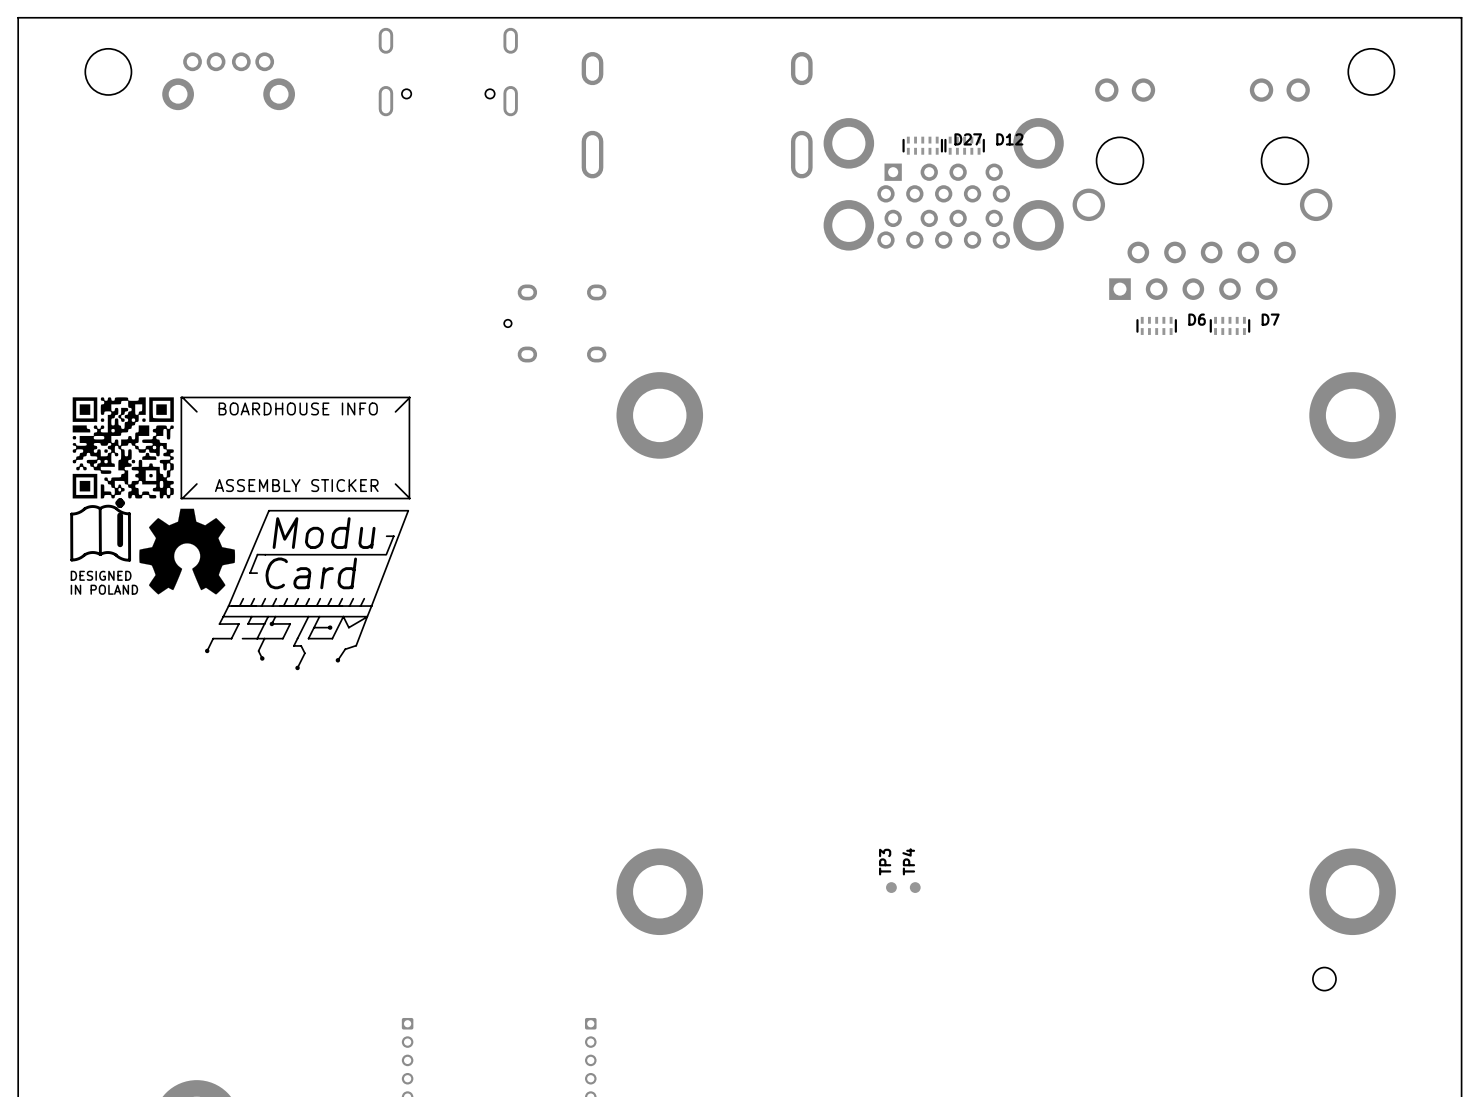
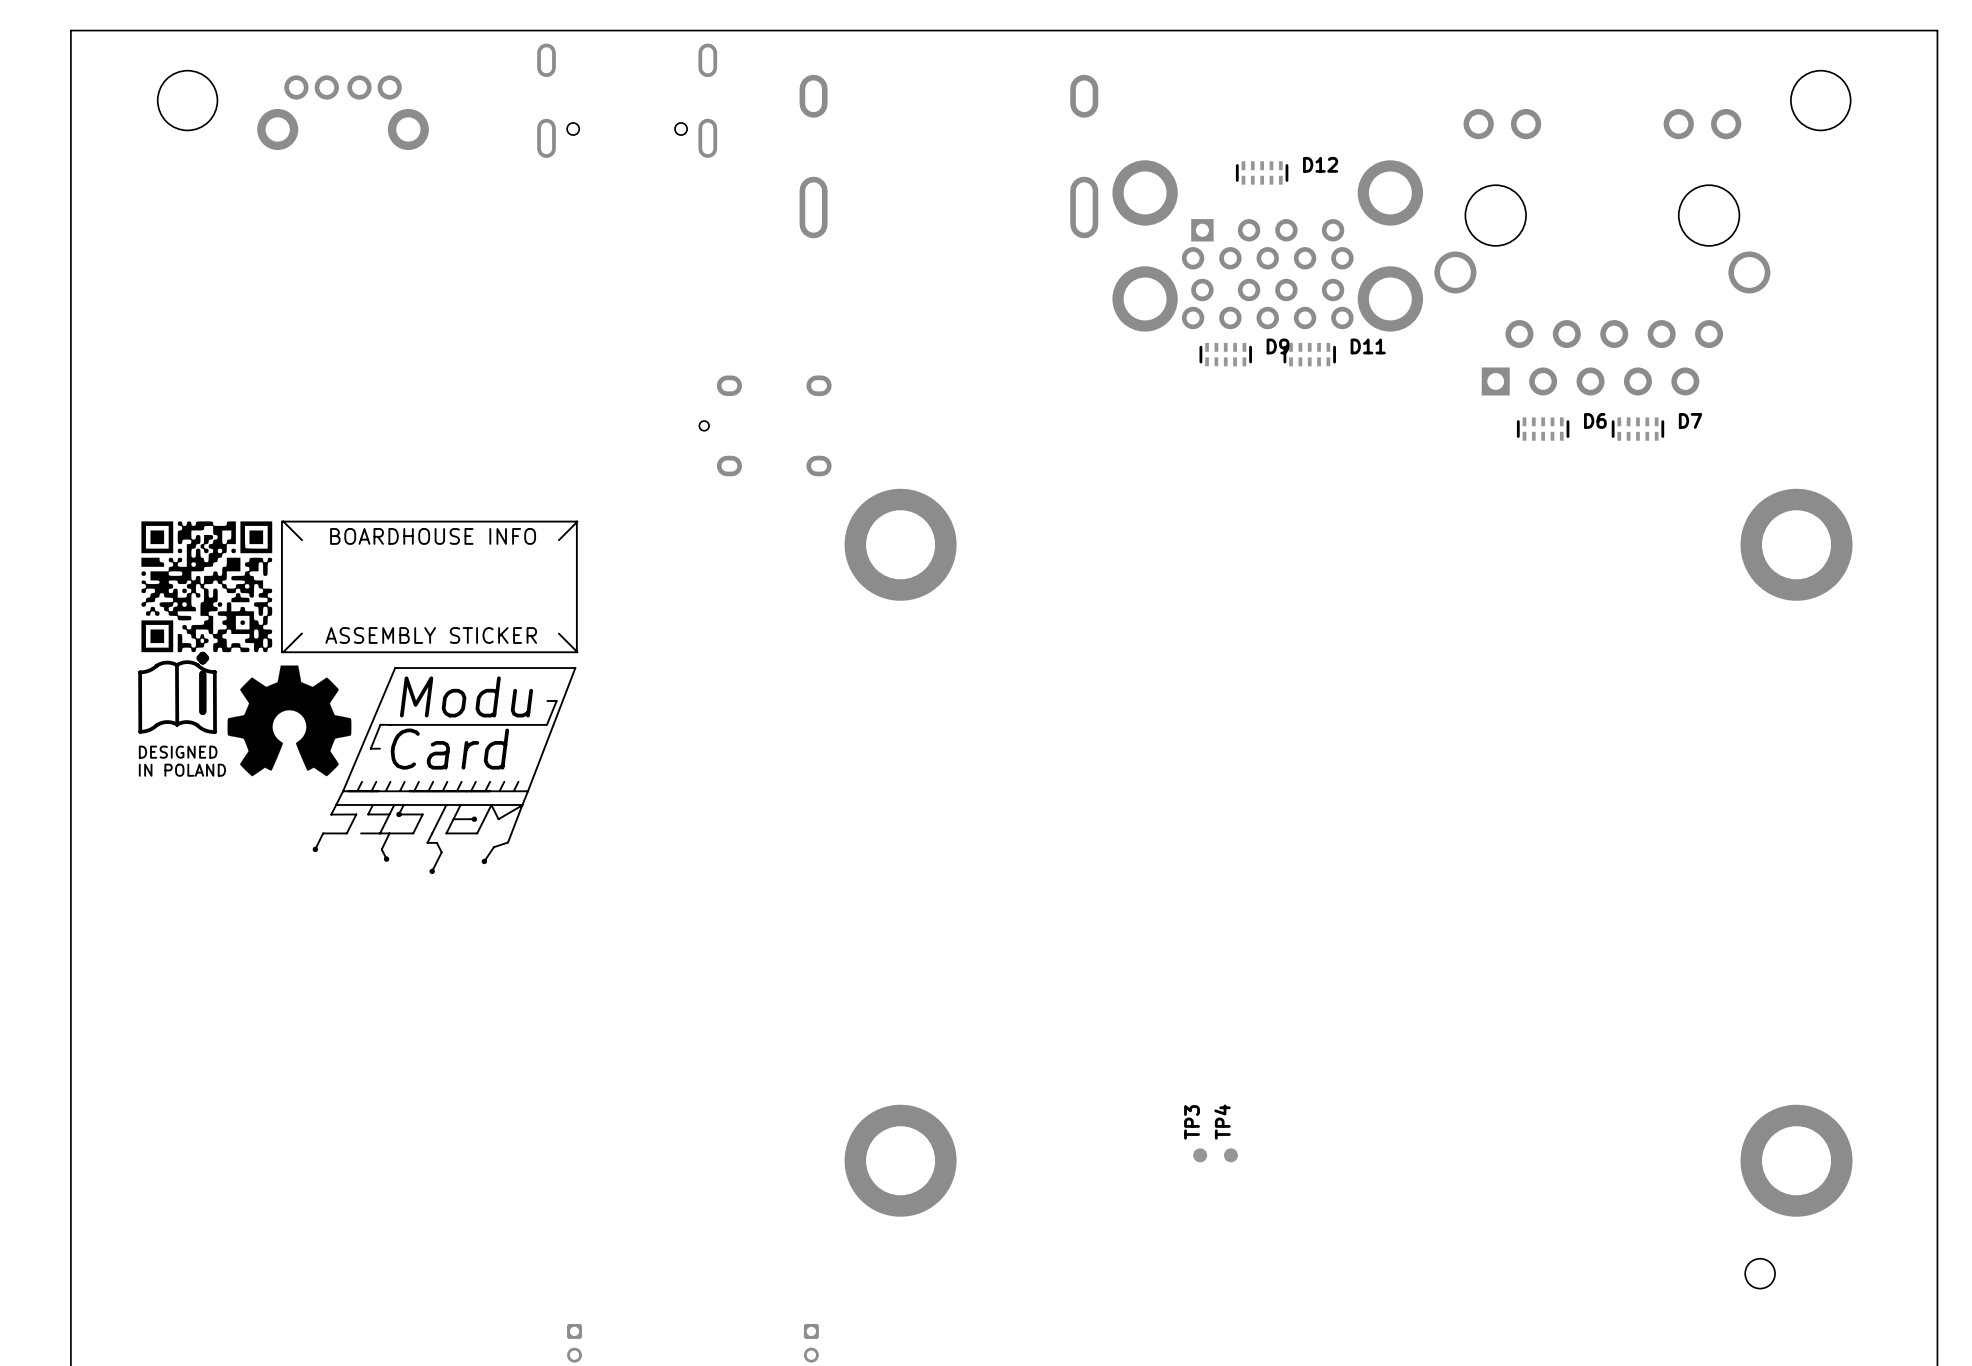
D27: (922, 146) -> none
D12 position: (964, 146) -> (1262, 174)
D9: none -> (1225, 355)
D11: none -> (1309, 355)

